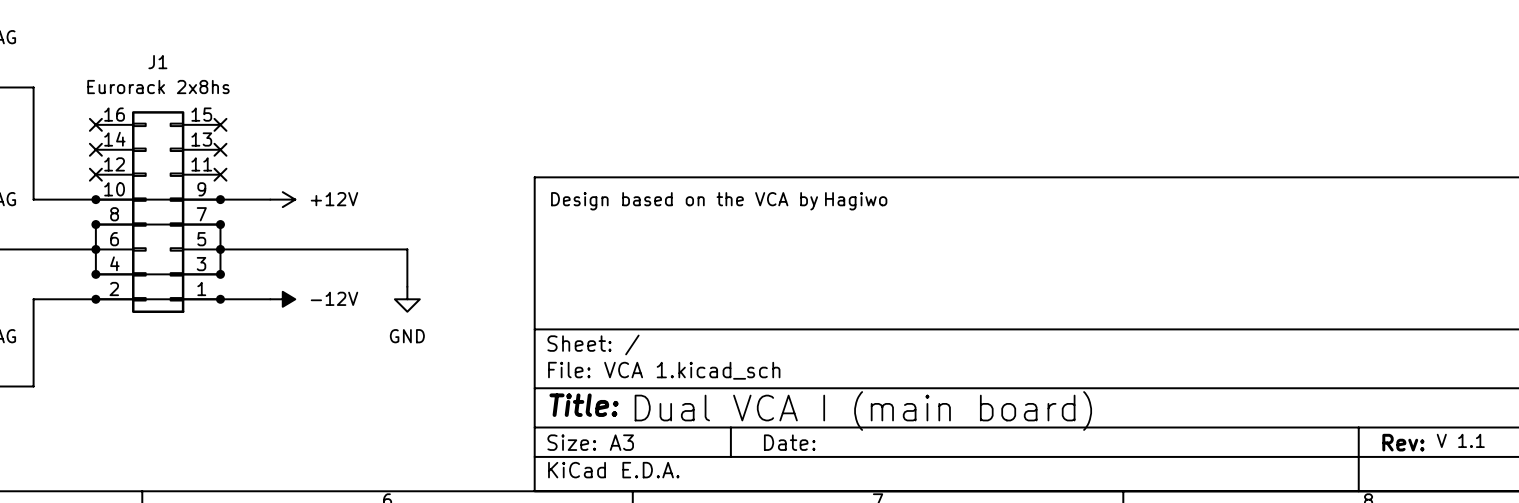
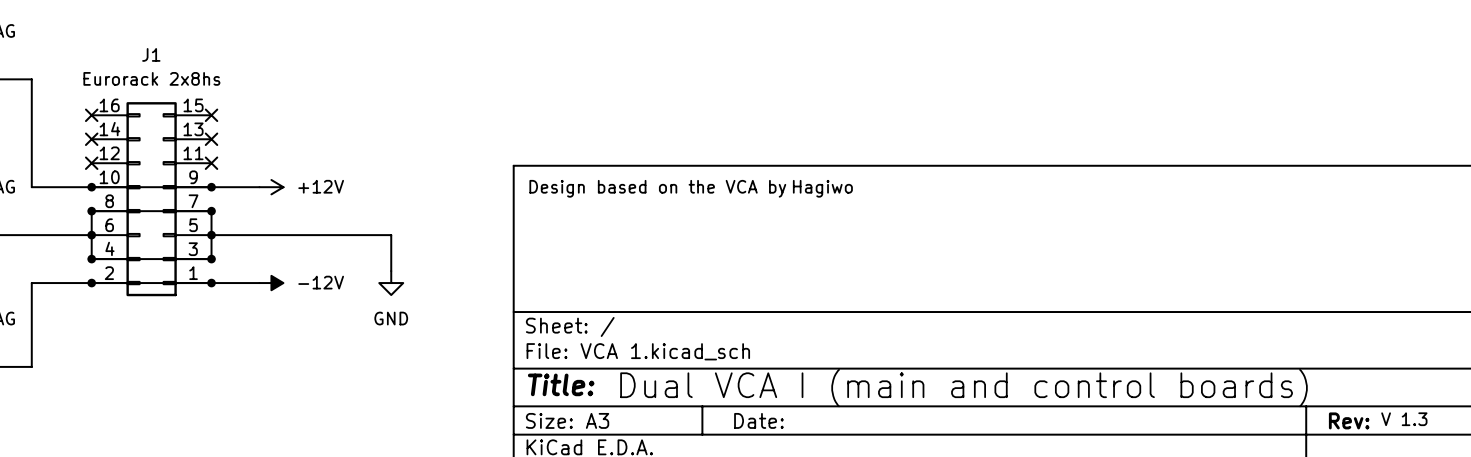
text: Dual VCA I (main board) (863, 410) -> Dual VCA I (main and control boards) (963, 388)
text: V 1.1 (1460, 440) -> V 1.3 (1404, 419)

